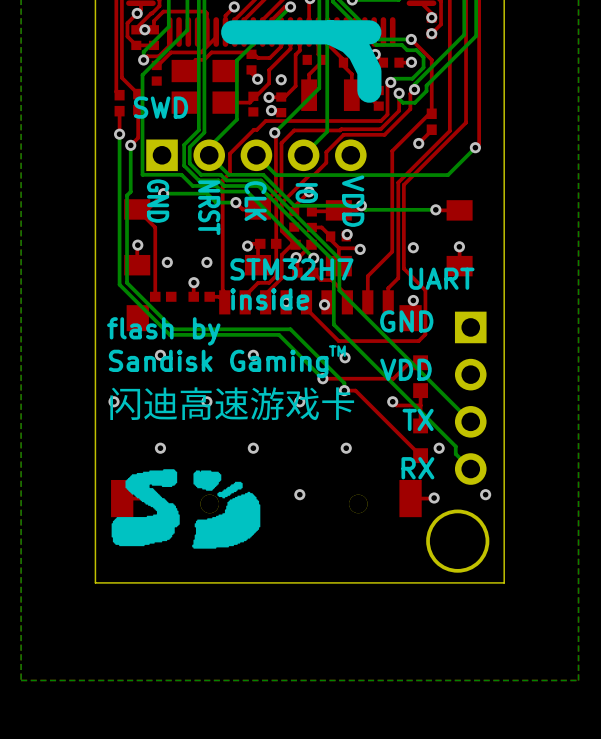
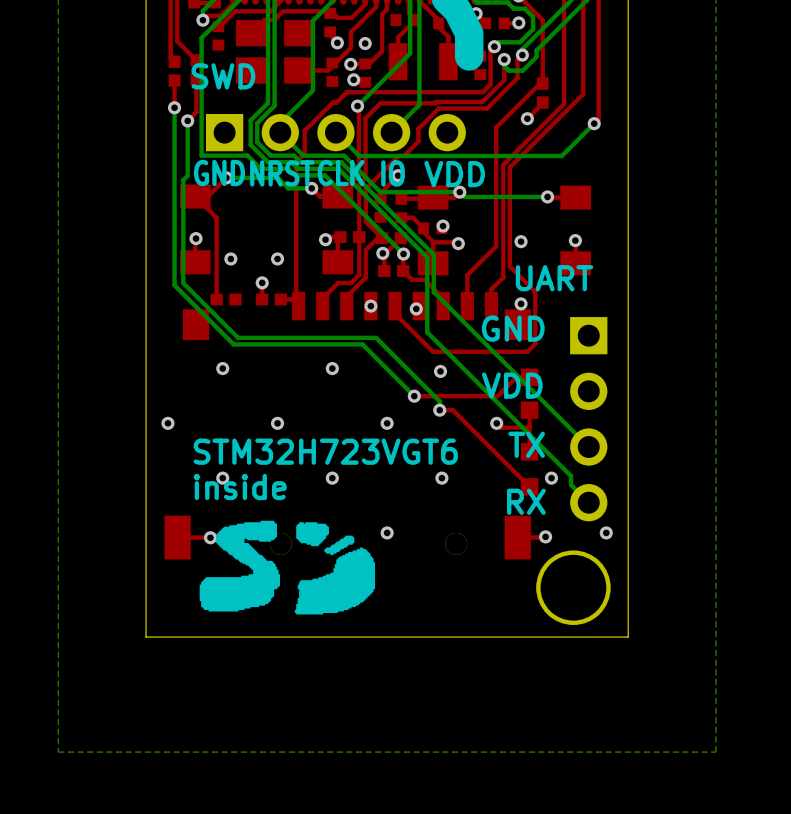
text rotation: 0° (306, 193) -> 90° counterclockwise (393, 173)
text rotation: 0° (158, 201) -> 90° counterclockwise (219, 173)
text rotation: 0° (255, 201) -> 90° counterclockwise (341, 173)
text rotation: 0° (353, 201) -> 90° counterclockwise (454, 174)
text rotation: 0° (209, 207) -> 90° counterclockwise (282, 173)
text: STM32H7 (291, 269) -> none
text position: inside (269, 299) -> inside (240, 486)
text: flash by (163, 331) -> none
text: TM (337, 351) -> none
text: Sandisk Gaming (218, 363) -> none
text: 闪迪高速游戏卡 (232, 403) -> none
text: none -> STM32H723VGT6 (325, 451)
drawing position: (207, 480) -> (312, 534)
drawing position: (230, 490) -> (339, 545)
drawing position: (145, 507) -> (239, 566)
drawing position: (226, 520) -> (334, 580)

